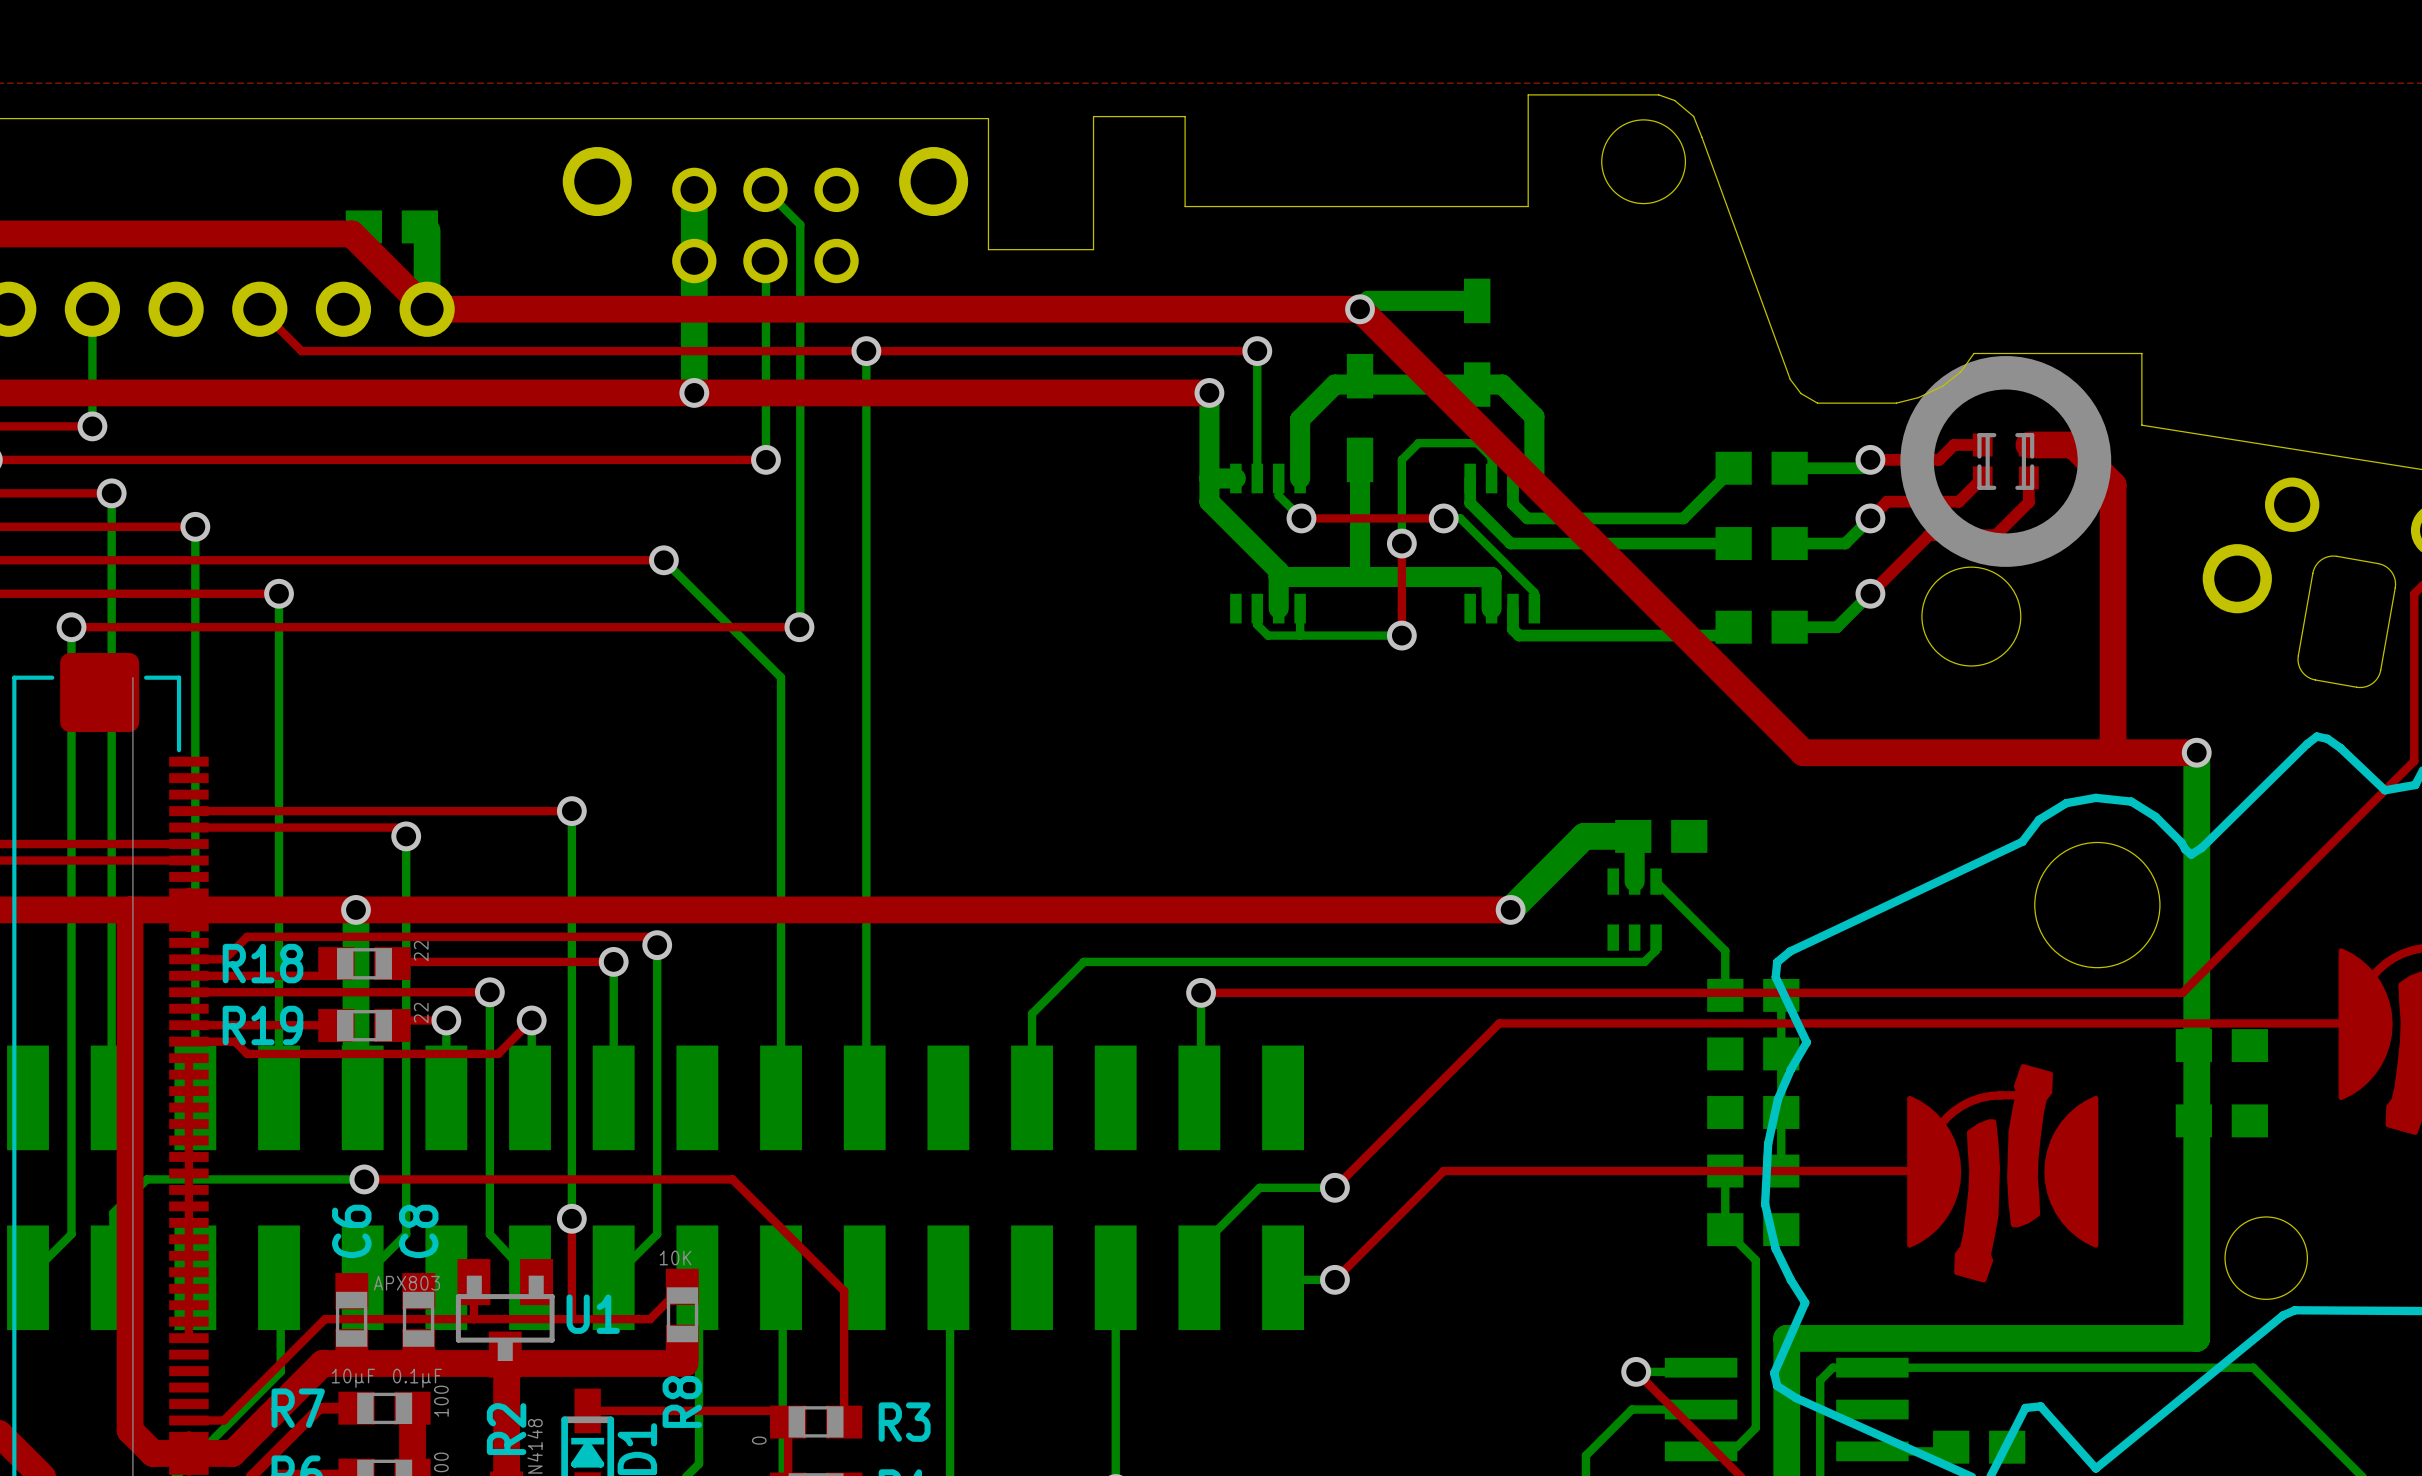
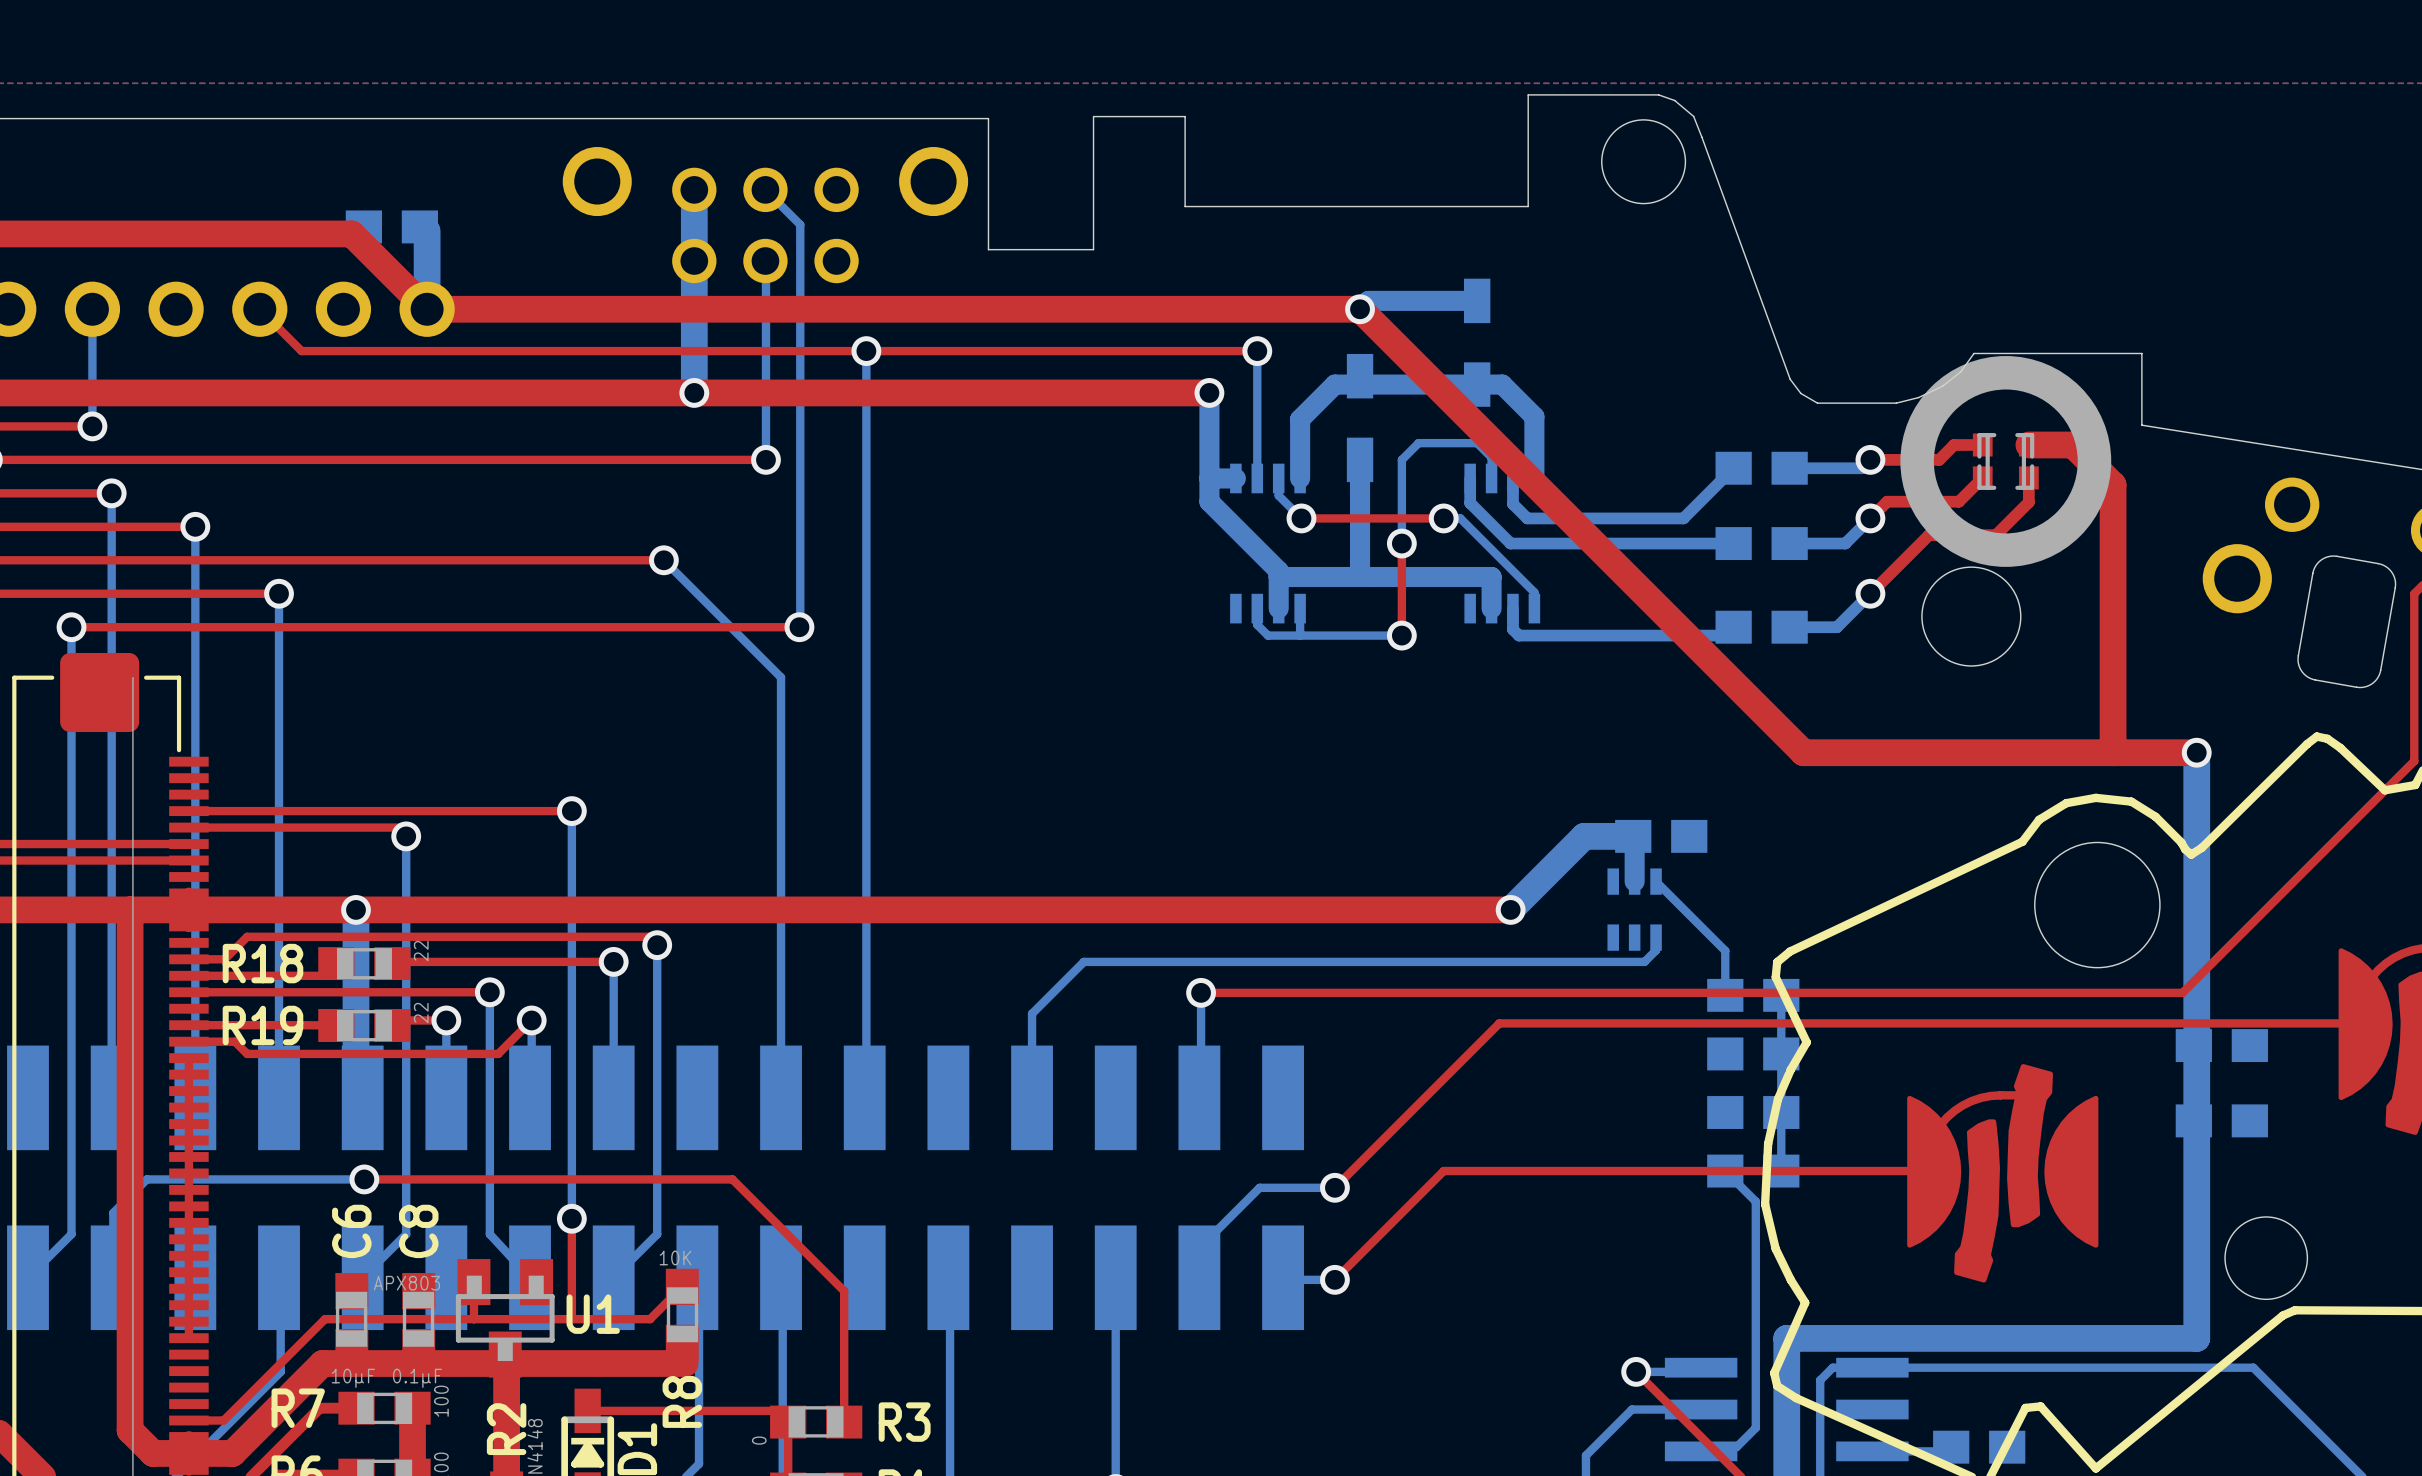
bottom track: (1725, 1171) (1725, 1229) (1755, 1260) -> (1725, 1171) (1755, 1201) (1755, 1260)
part: (1753, 1229) -> none

